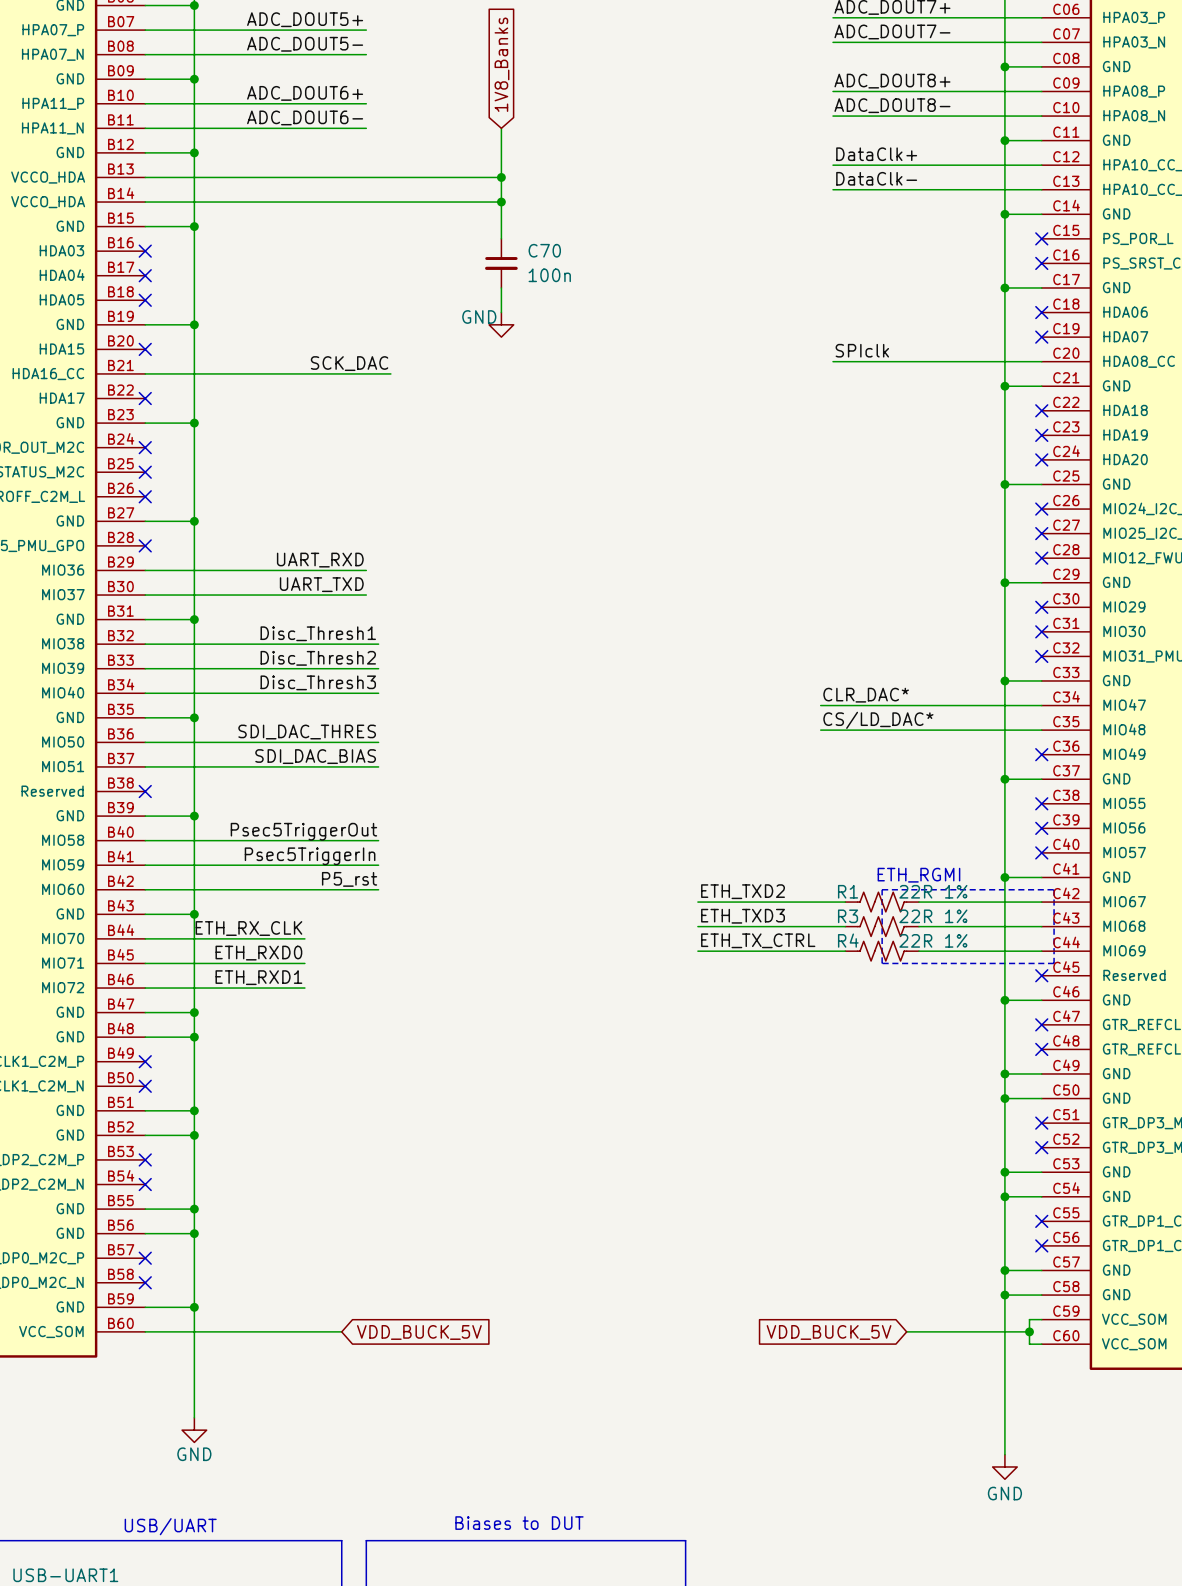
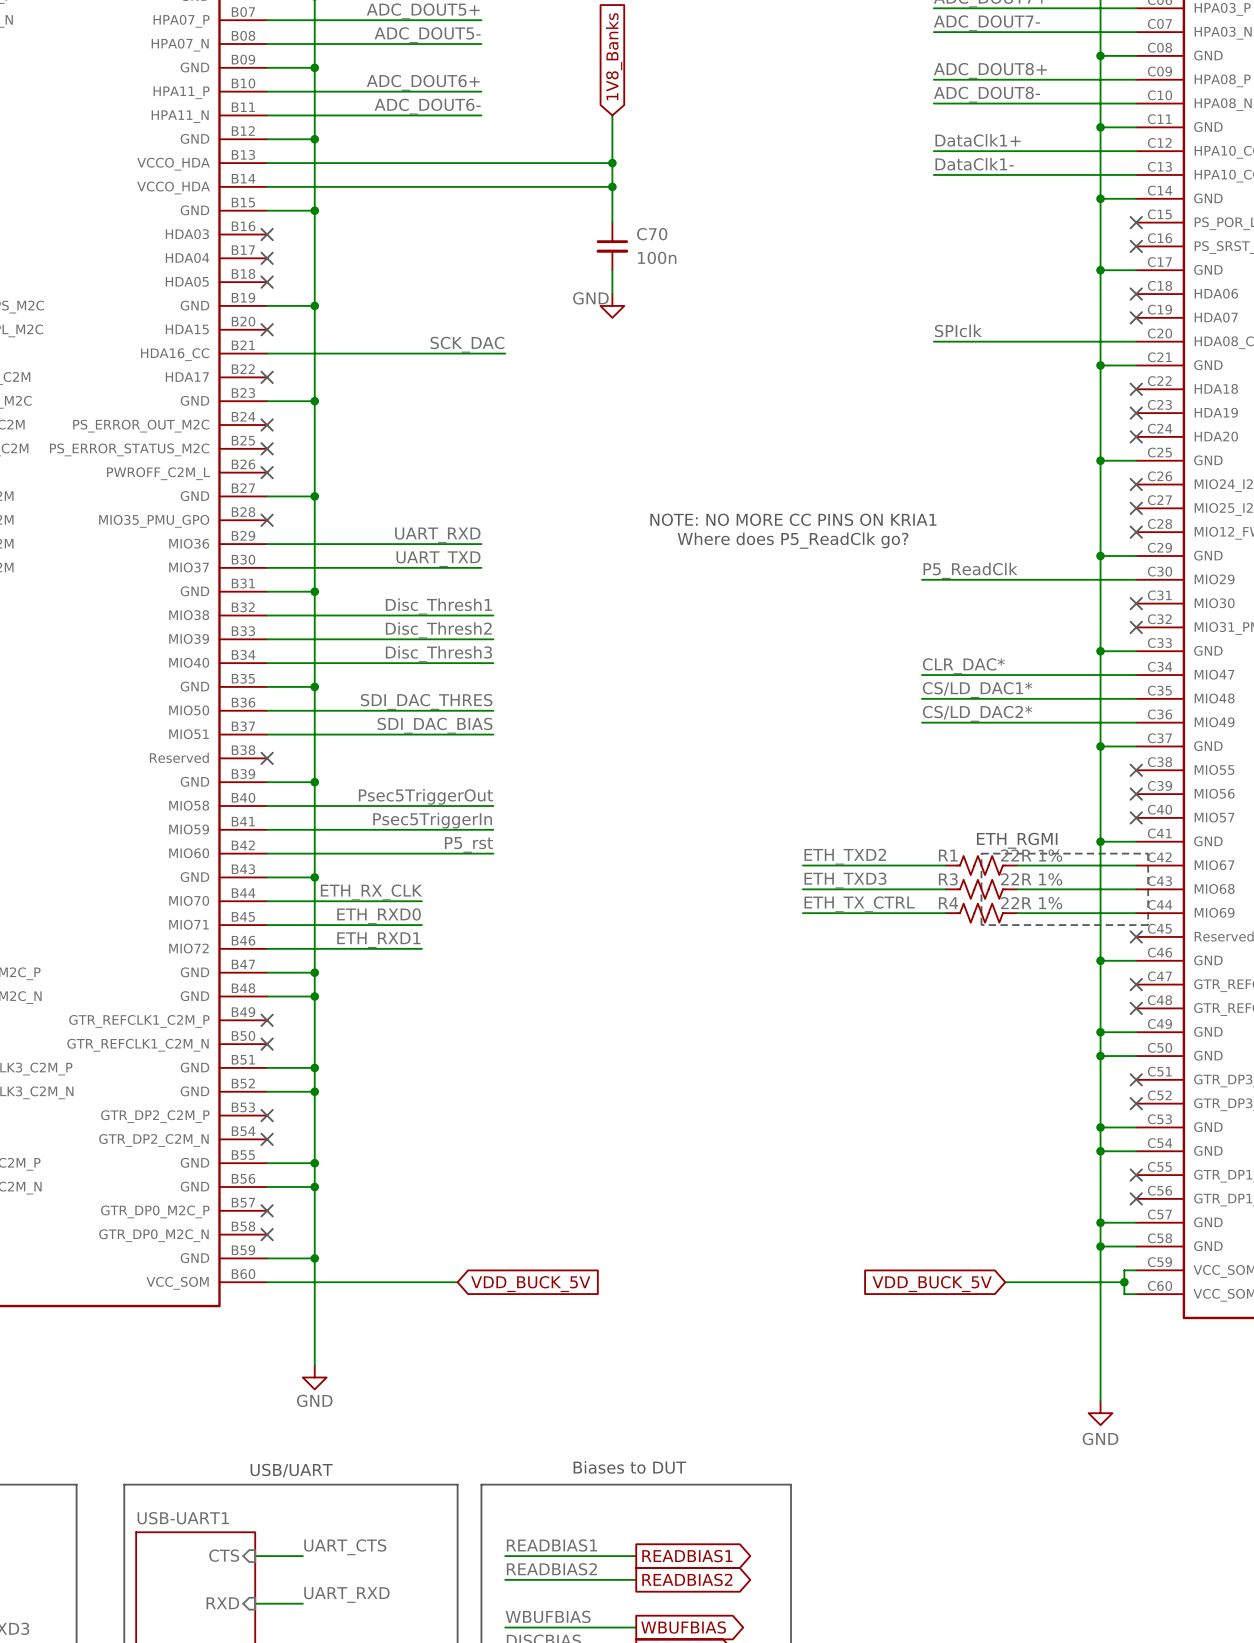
label: DataClk+ (876, 154) -> DataClk1+ (978, 140)
label: DataClk- (876, 178) -> DataClk1- (974, 164)
text: none -> NOTE: NO MORE CC PINS ON KRIA1 (793, 519)
text: none -> Where does P5_ReadClk go? (793, 540)
label: none -> P5_ReadClk (970, 570)
wire: none -> (921, 579) (1136, 579)
no-connect mark: (1041, 607) -> none
label: CS/LD_DAC* (878, 720) -> CS/LD_DAC1* (977, 690)
label: none -> CS/LD_DAC2* (977, 713)
wire: none -> (921, 722) (1136, 722)
no-connect mark: (1041, 754) -> none

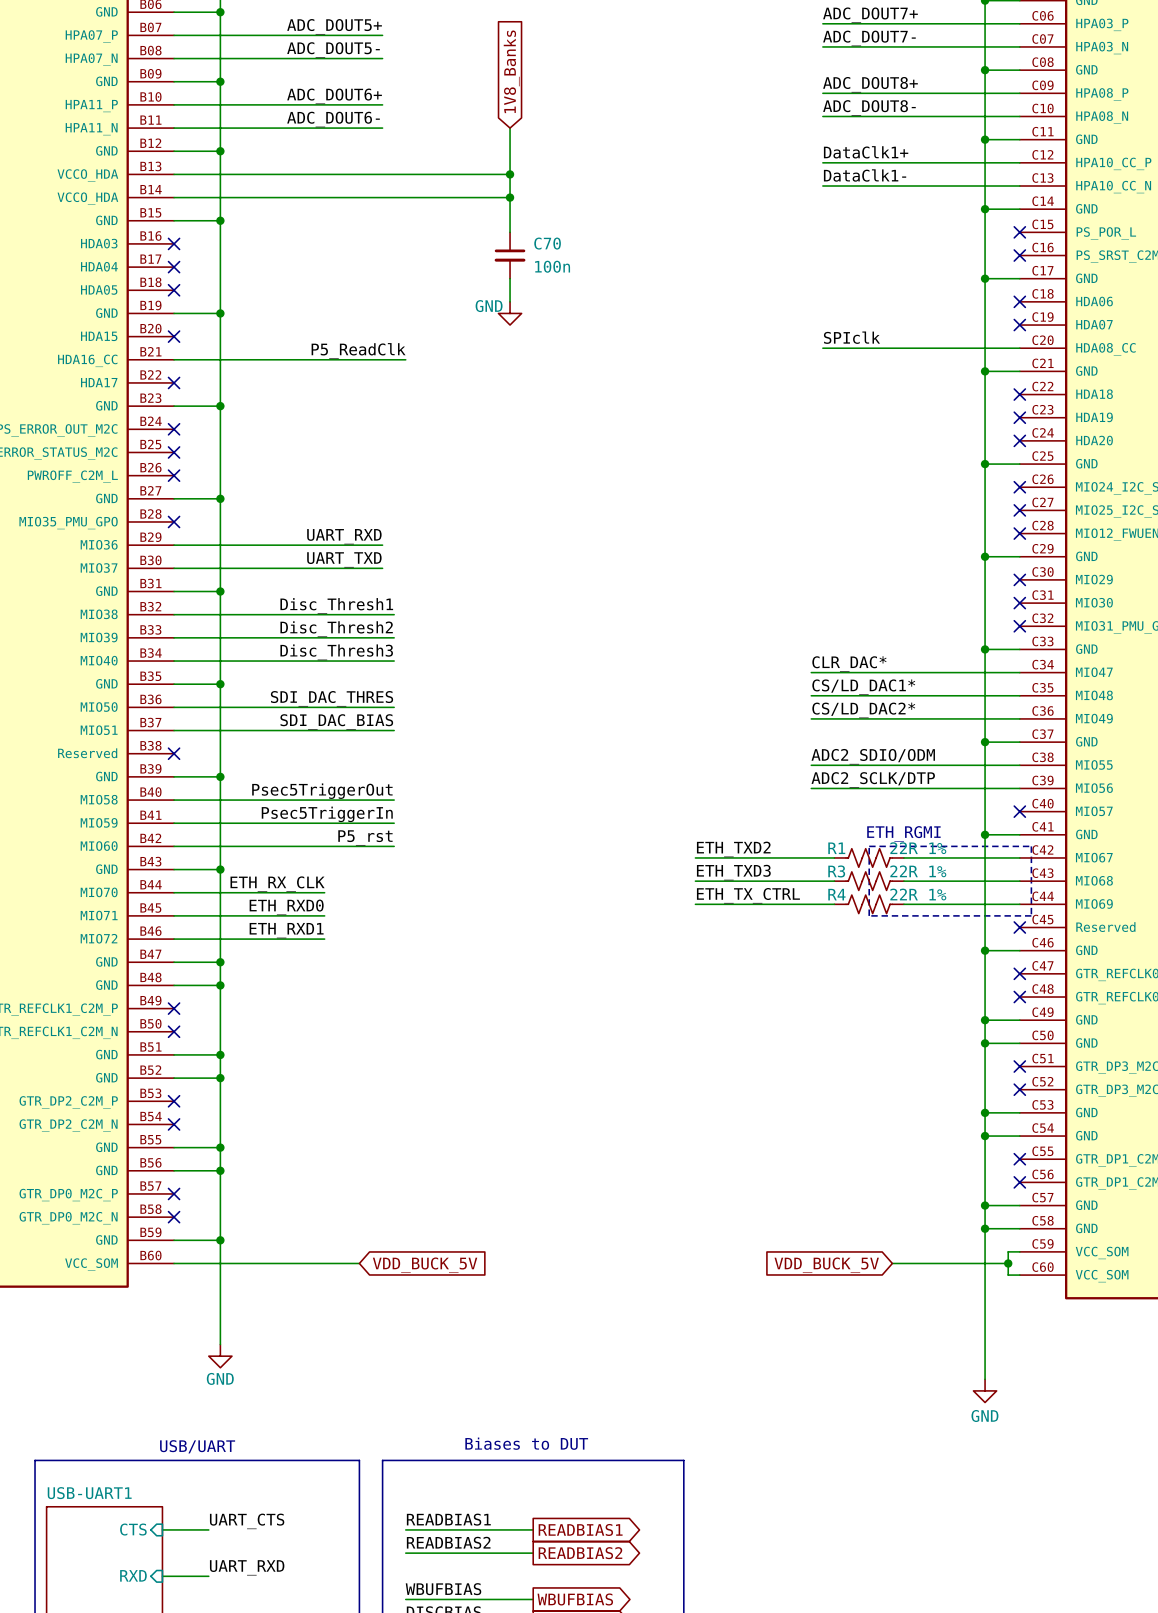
label: SCK_DAC (467, 344) -> P5_ReadClk (358, 351)
text: NOTE: NO MORE CC PINS ON KRIA1 (793, 519) -> none
text: Where does P5_ReadClk go? (793, 540) -> none
label: P5_ReadClk (970, 570) -> none
wire: (921, 579) (1136, 579) -> (811, 765) (1019, 765)
no-connect mark: none -> (1019, 579)
label: none -> ADC2_SDIO/ODM (873, 756)
no-connect mark: (1136, 770) -> none
label: none -> ADC2_SCLK/DTP (873, 779)
wire: none -> (811, 788) (1019, 788)
no-connect mark: (1136, 794) -> none

